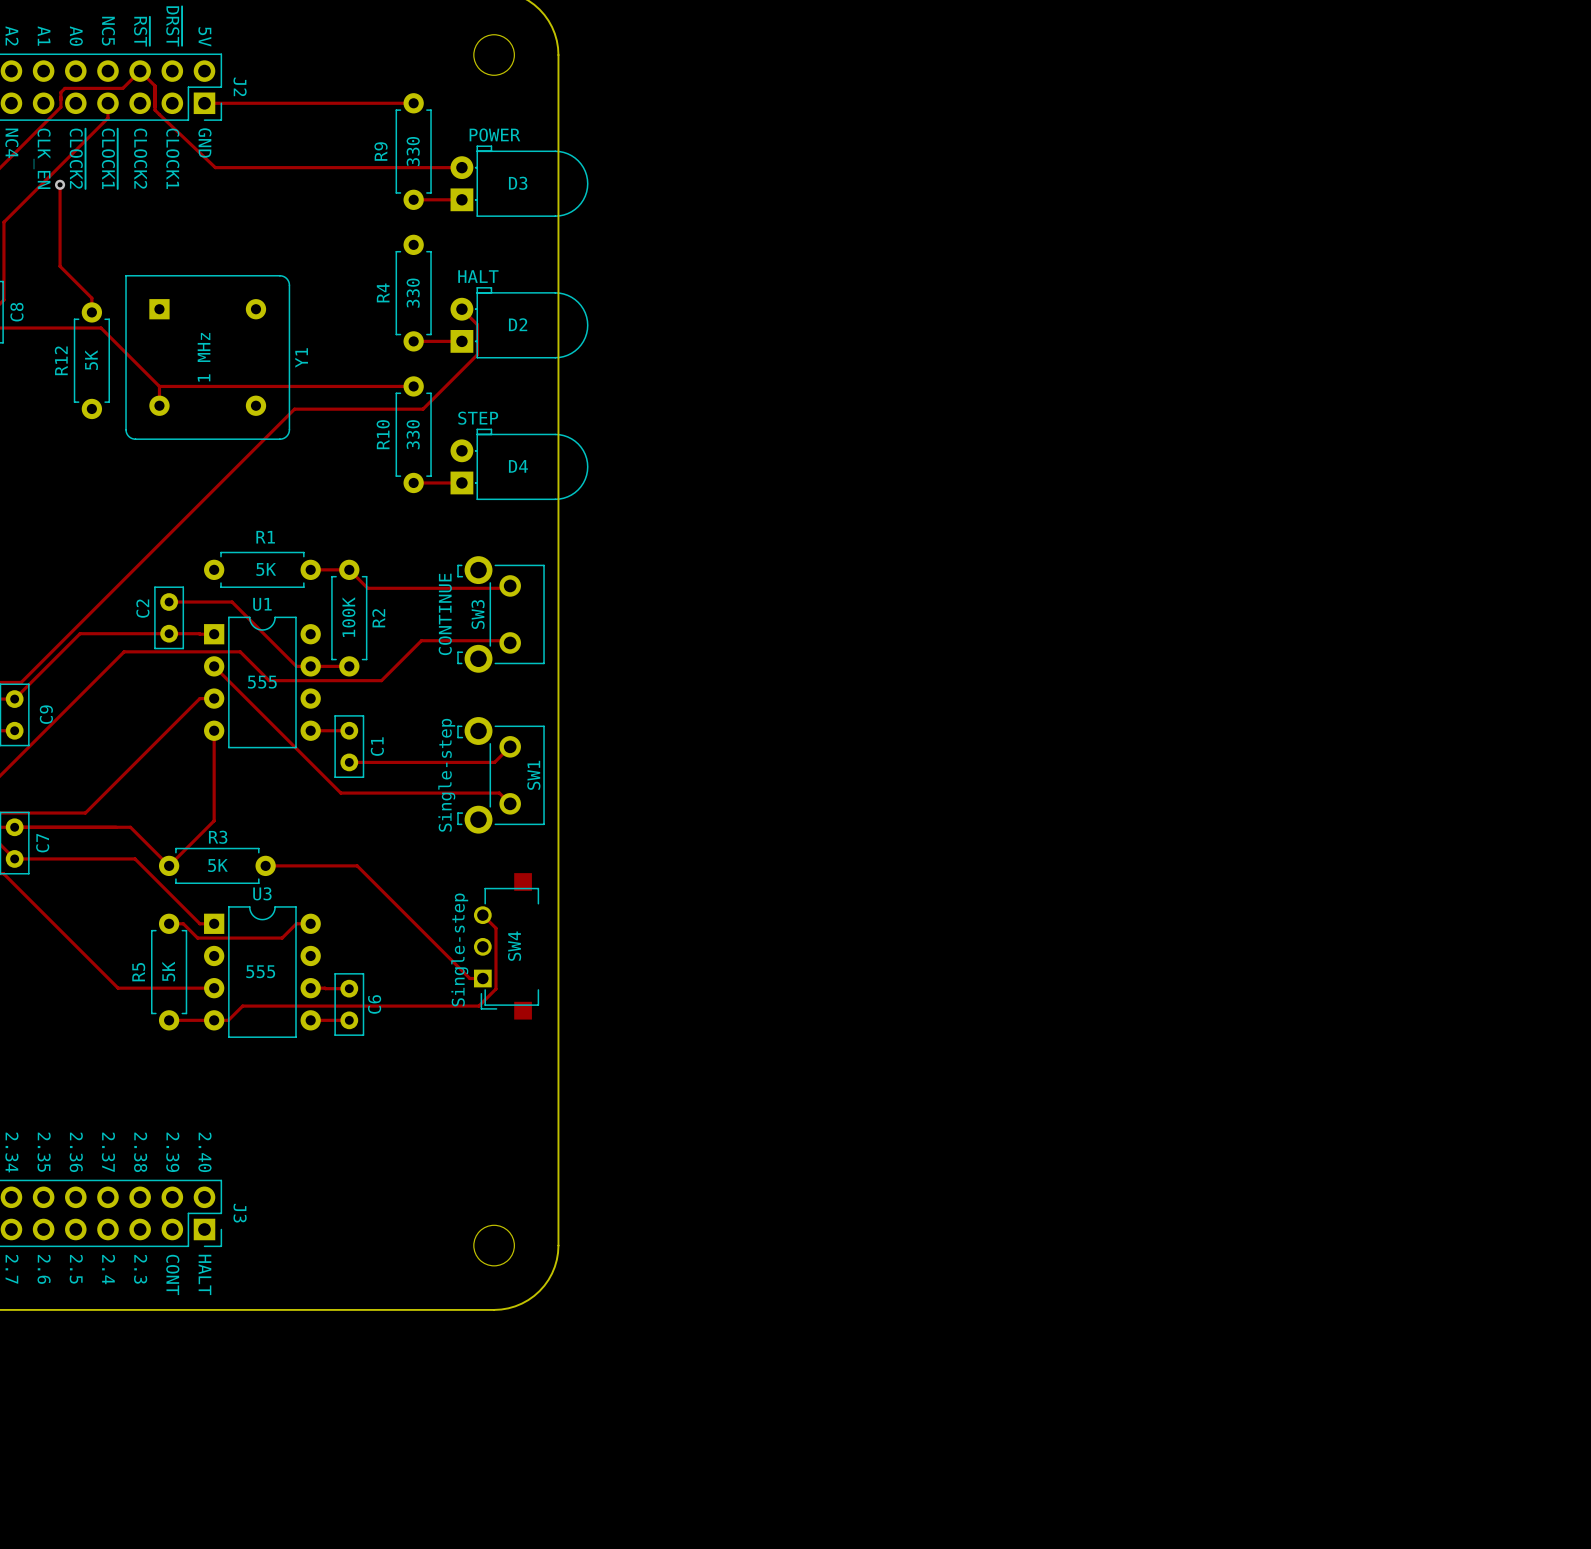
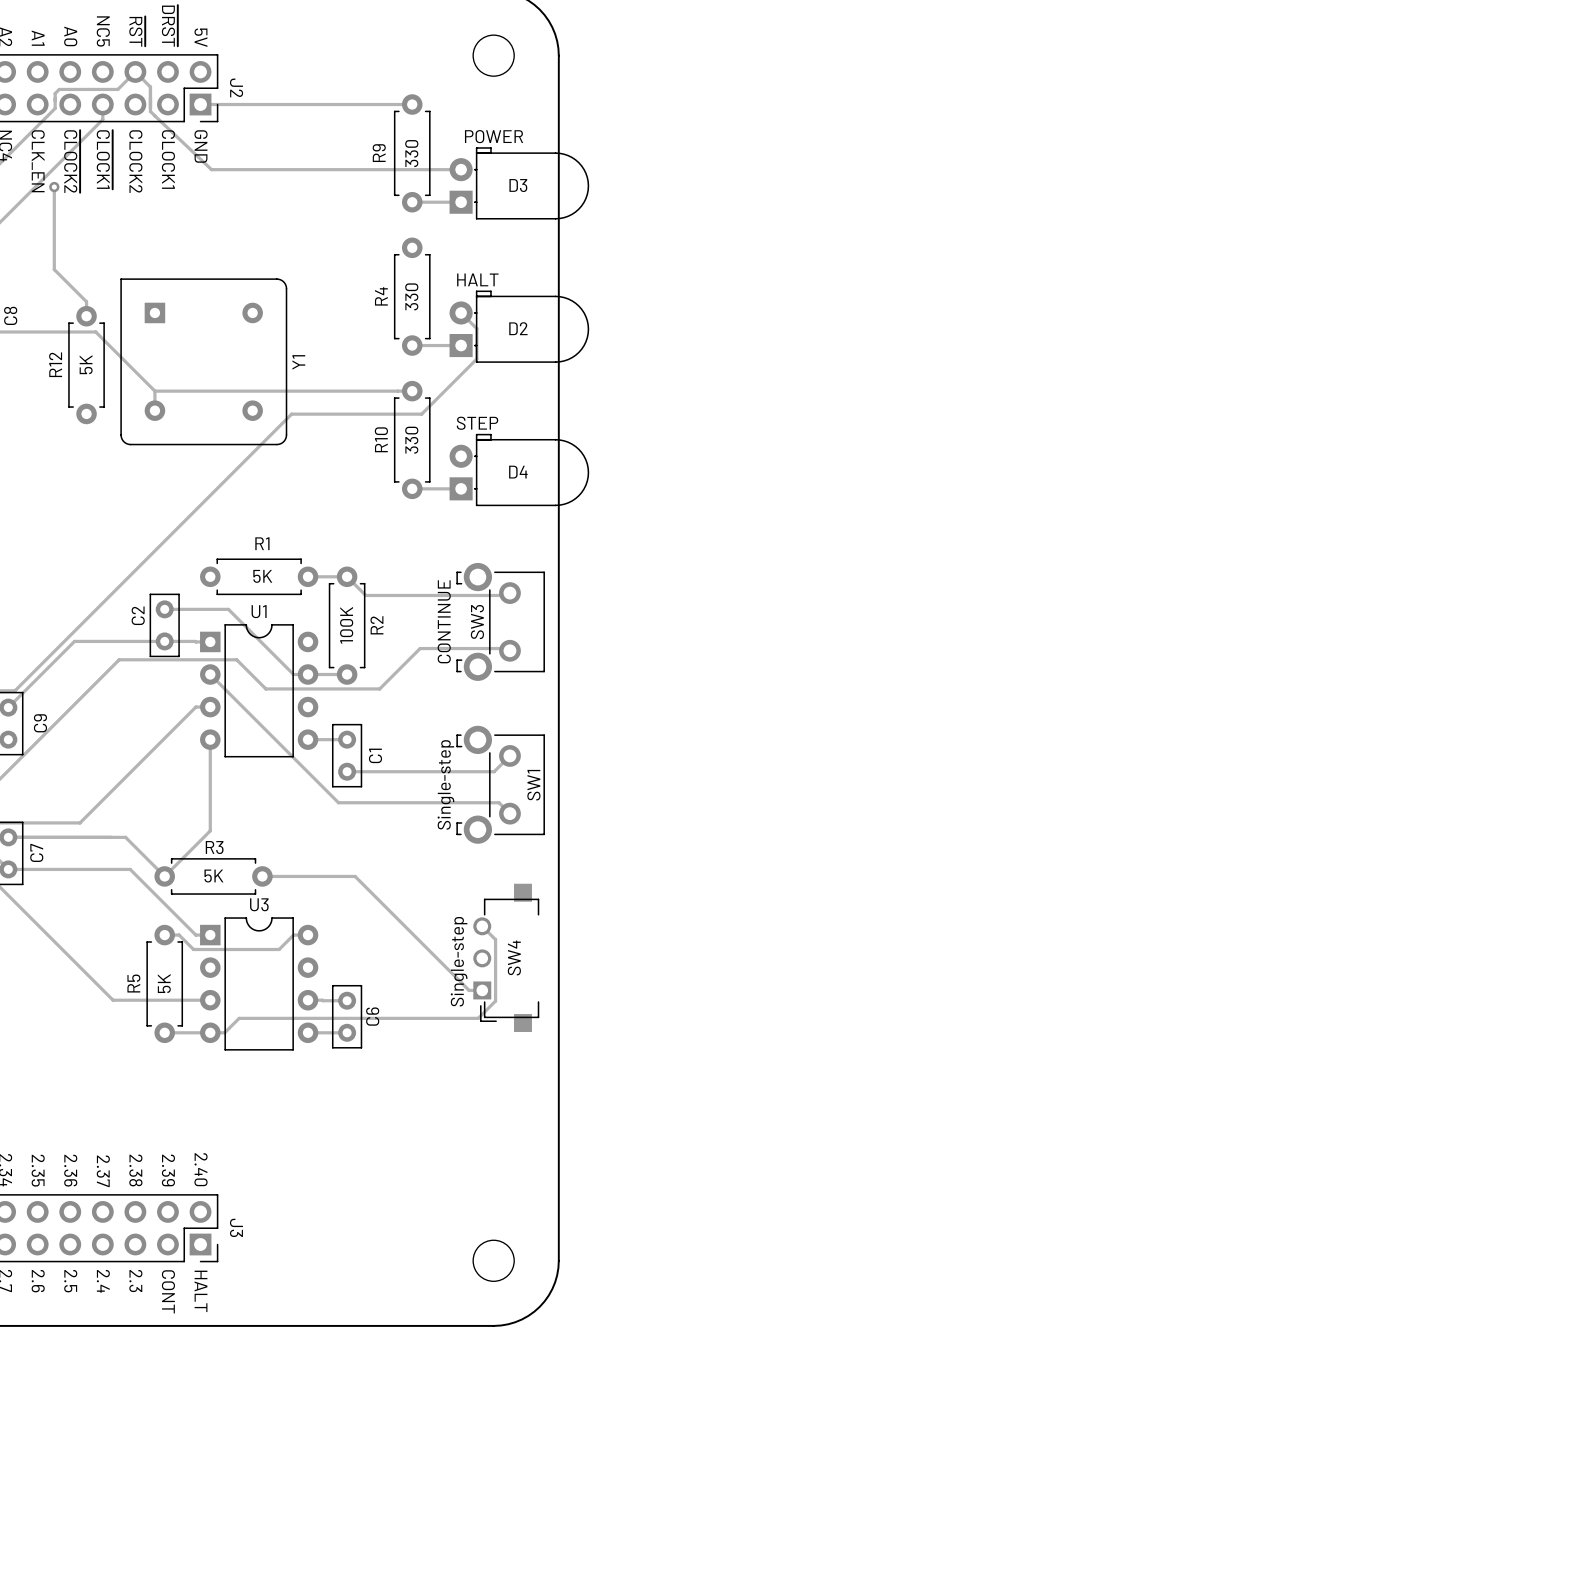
Y1 value: 1 MHz (204, 357) -> none
U1 value: 555 (262, 682) -> none
U3 value: 555 (260, 971) -> none

